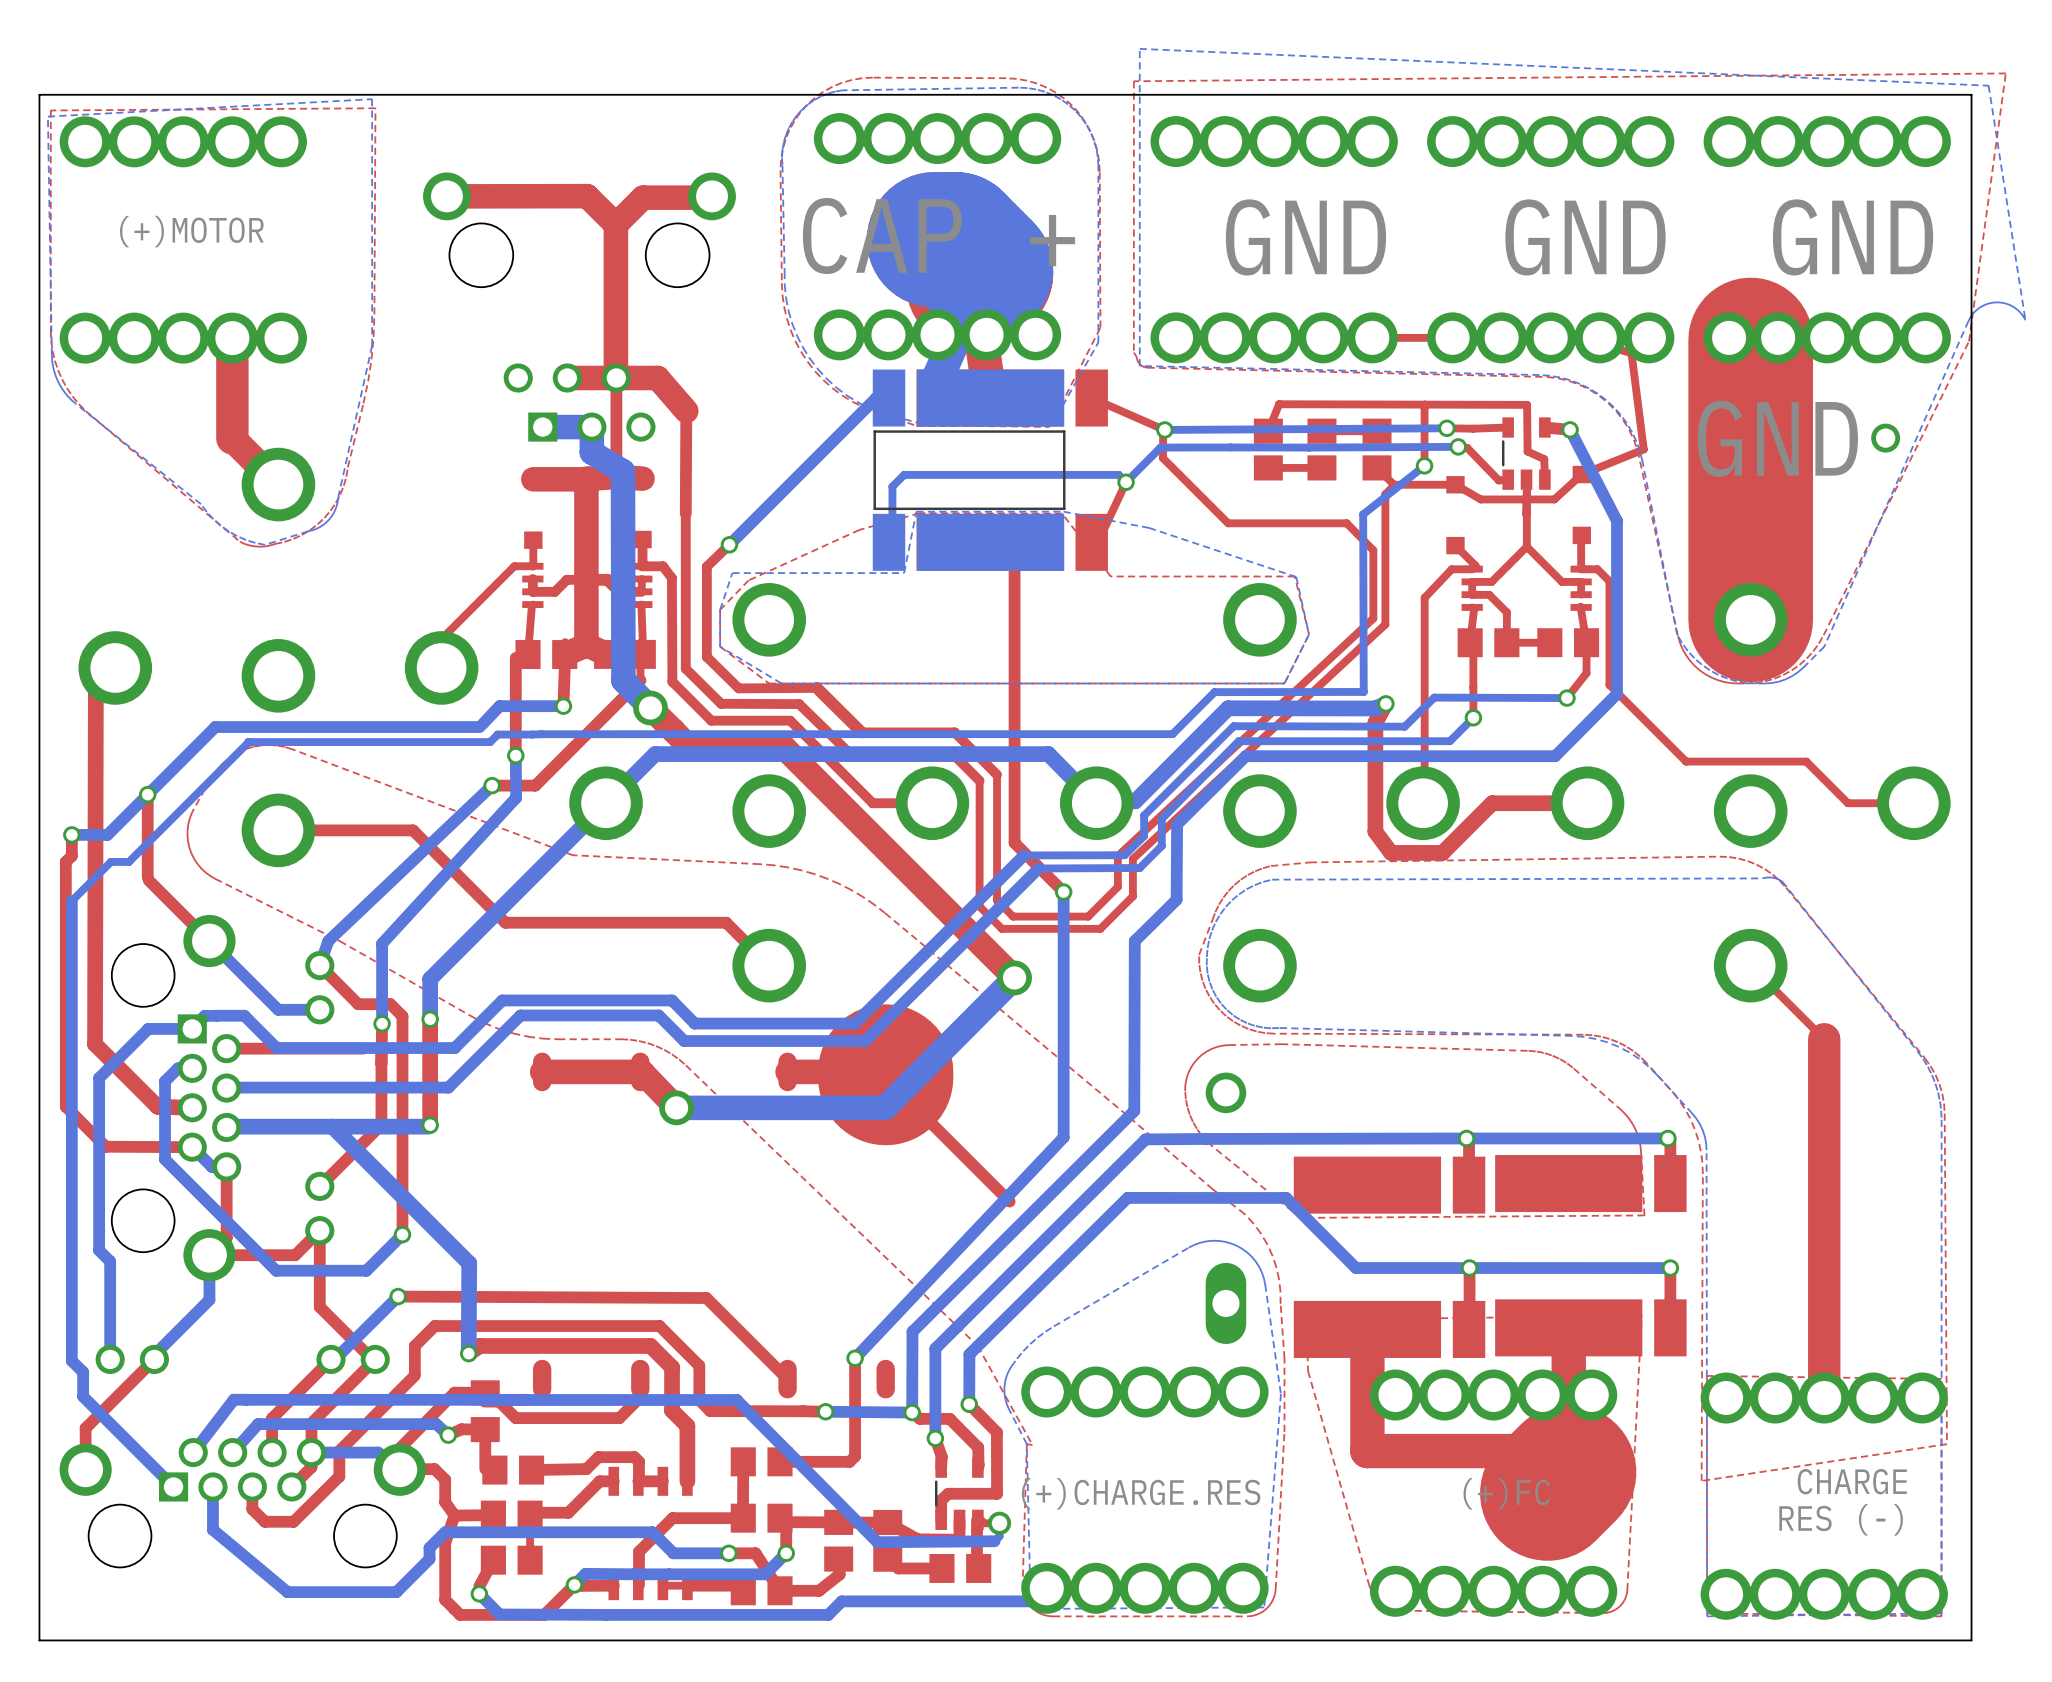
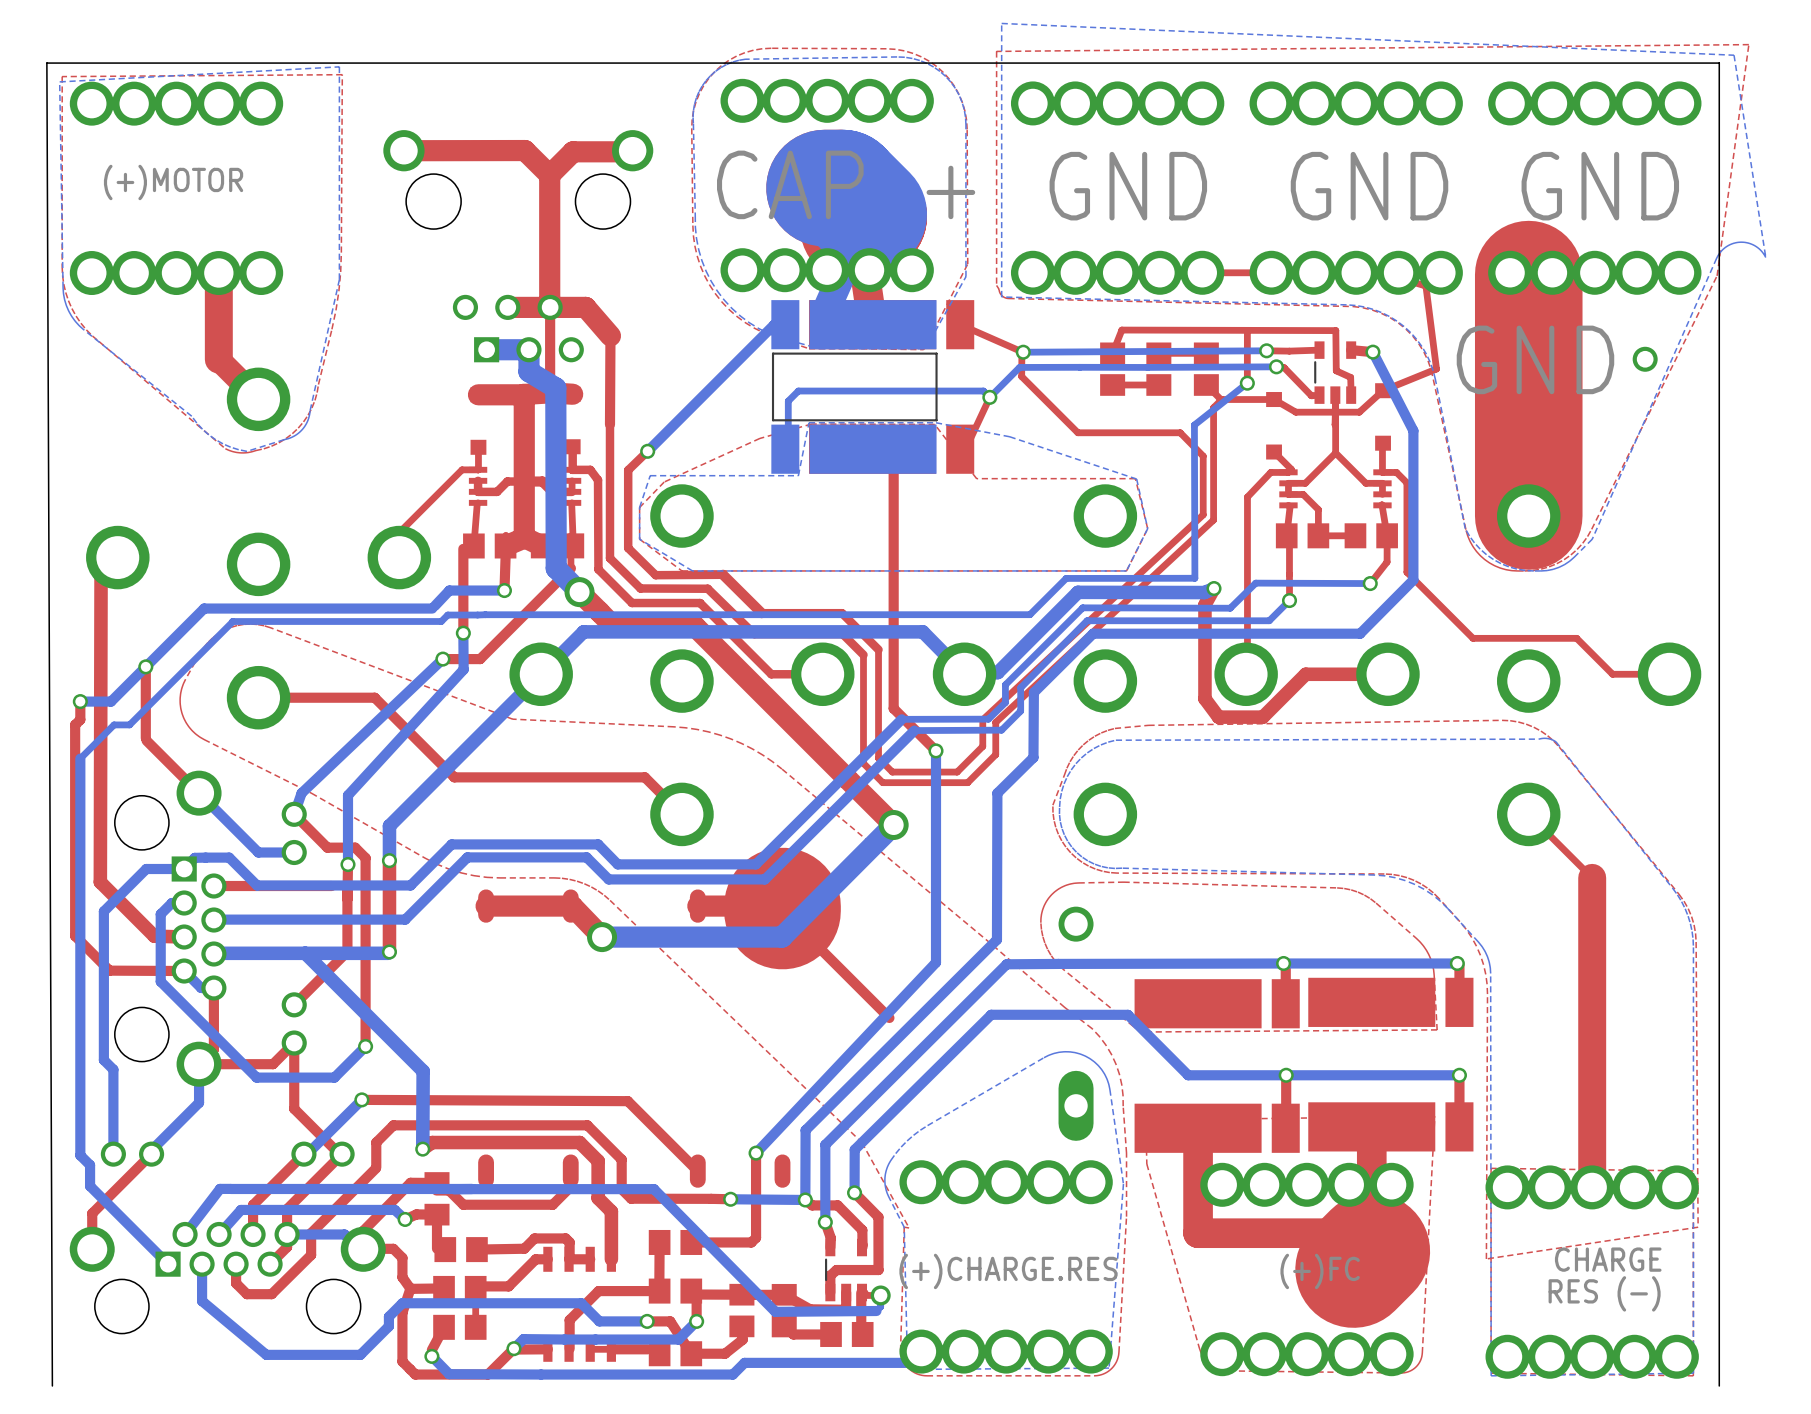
board edge: (39, 94) (39, 1640) (1971, 1640) (1971, 1628) -> (52, 63) (46, 63) (52, 1385)

